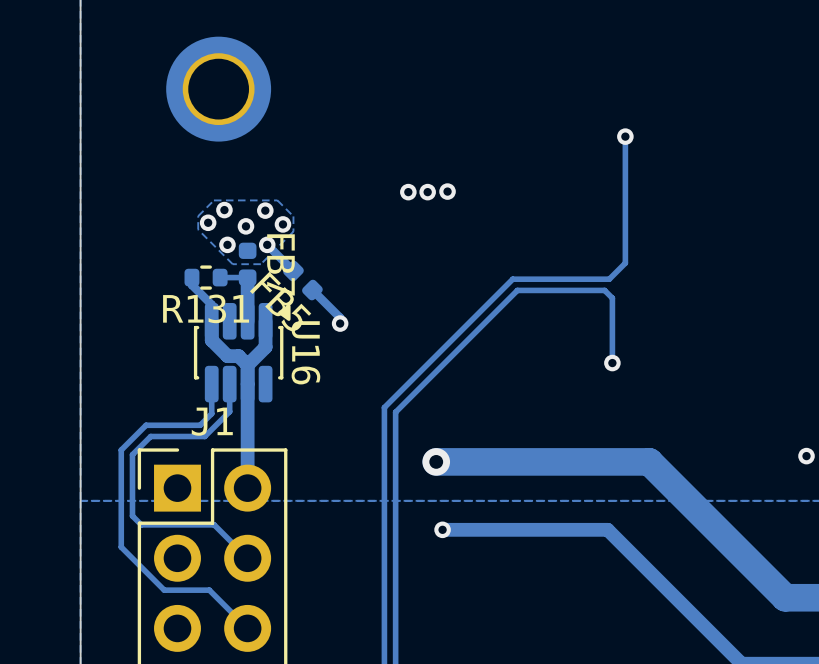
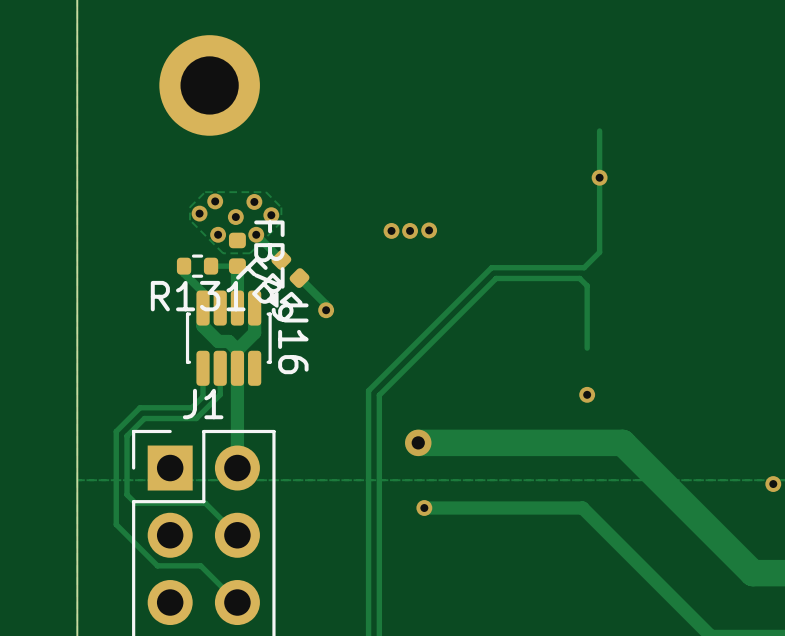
via position: (625, 136) -> (599, 177)
via: (447, 191) -> none
via: (408, 192) -> none
via: (427, 192) -> none
via: none -> (391, 230)
via: none -> (410, 230)
via: none -> (429, 230)
via position: (612, 363) -> (587, 394)
via: (806, 456) -> none
via: none -> (773, 484)

